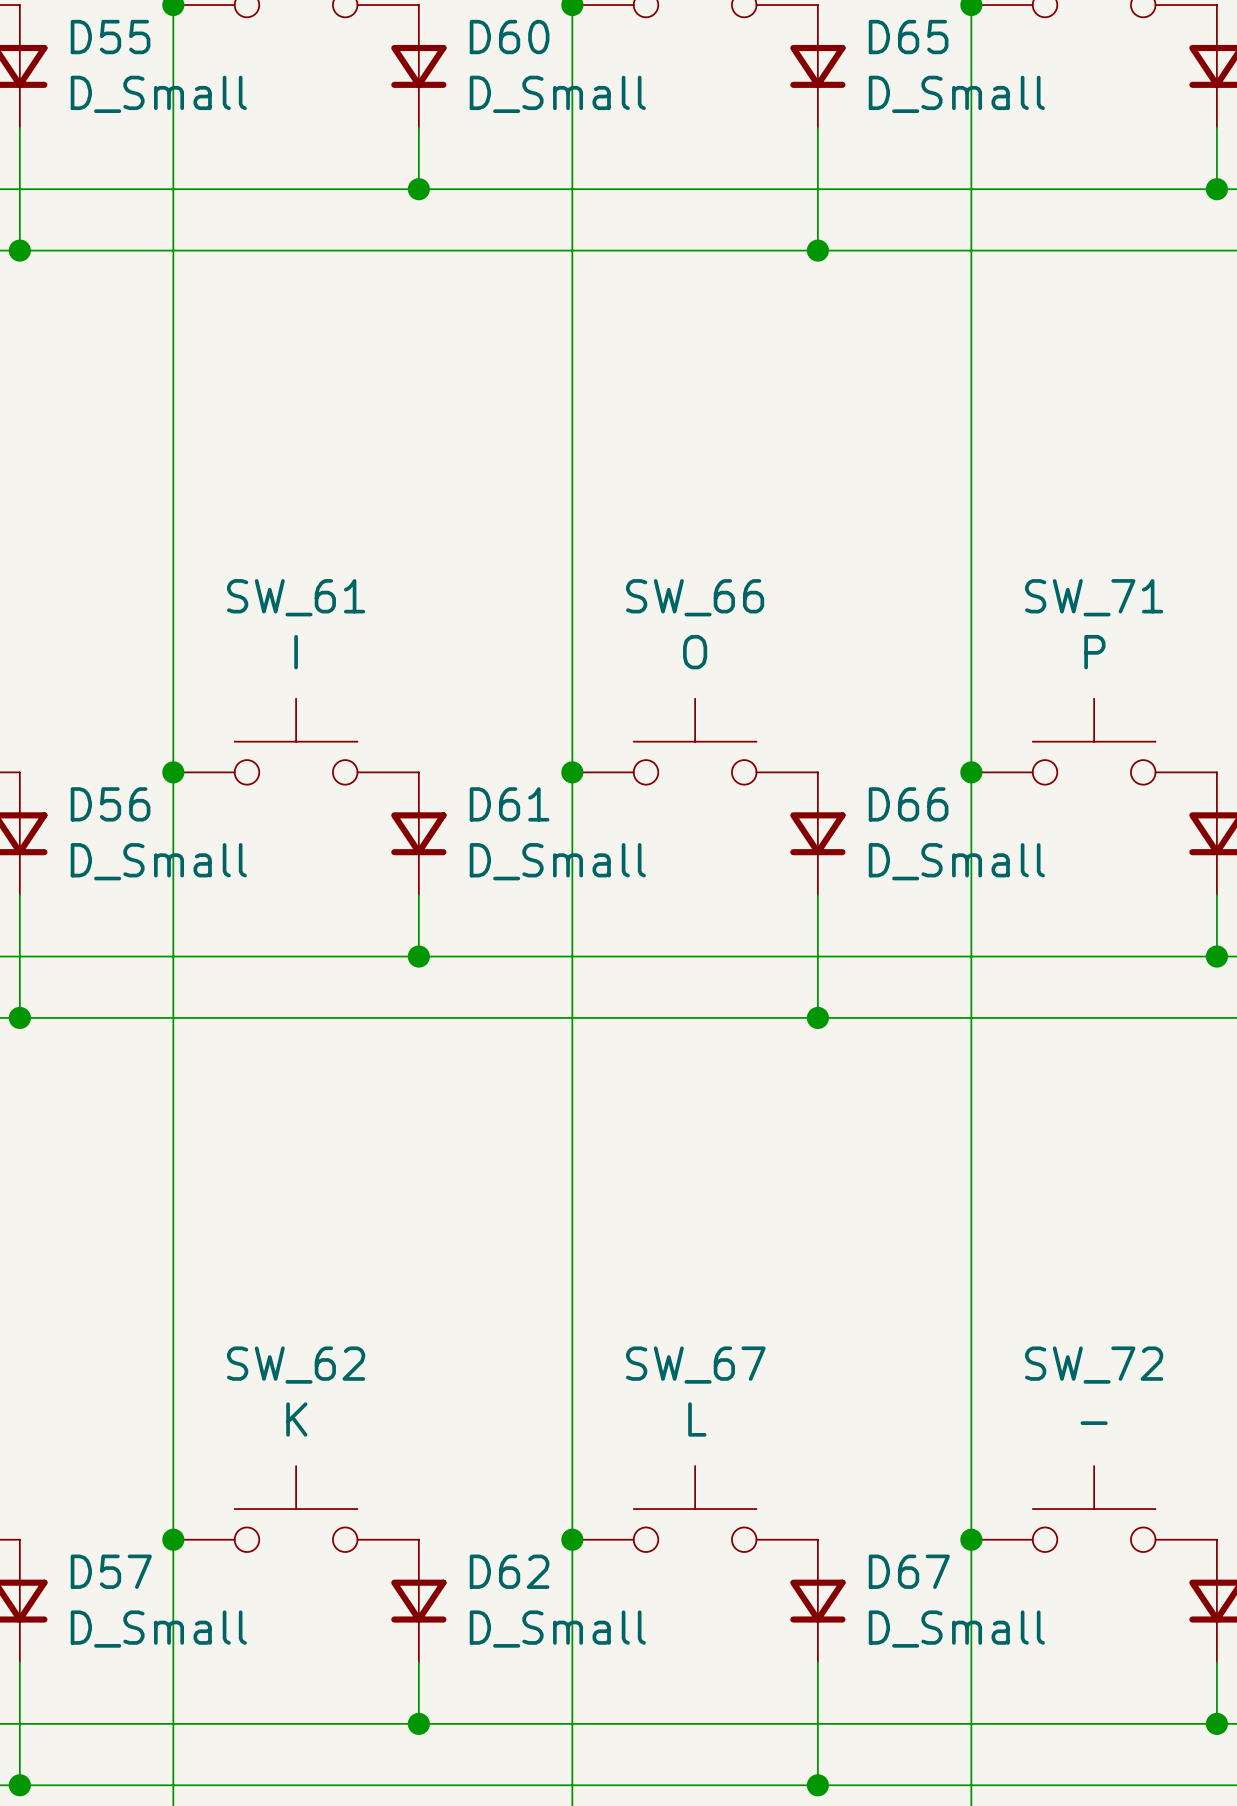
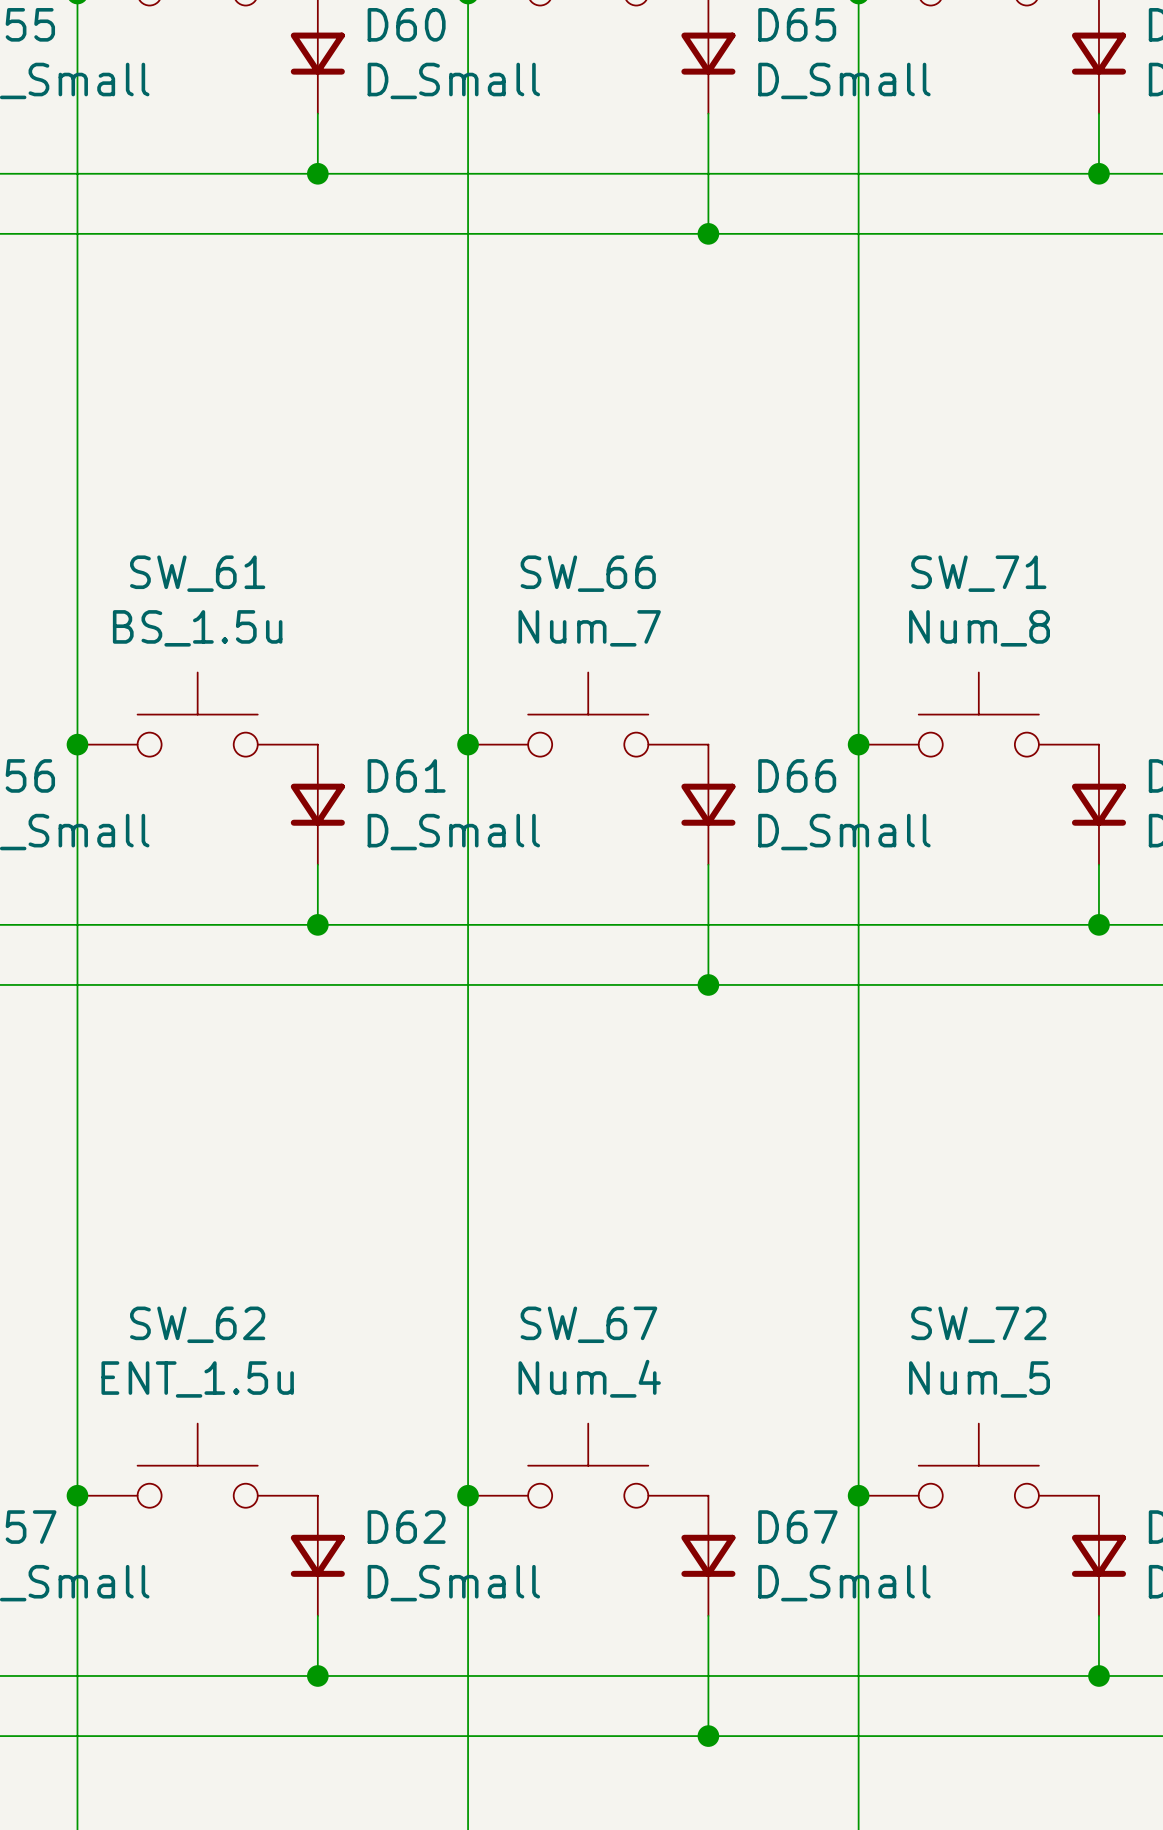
SW_61 value: I (296, 652) -> BS_1.5u (197, 628)
SW_66 value: O (695, 652) -> Num_7 (589, 628)
SW_71 value: P (1094, 652) -> Num_8 (979, 628)
SW_62 value: K (296, 1419) -> ENT_1.5u (197, 1379)
SW_67 value: L (697, 1419) -> Num_4 (589, 1378)
SW_72 value: - (1094, 1423) -> Num_5 (979, 1379)

